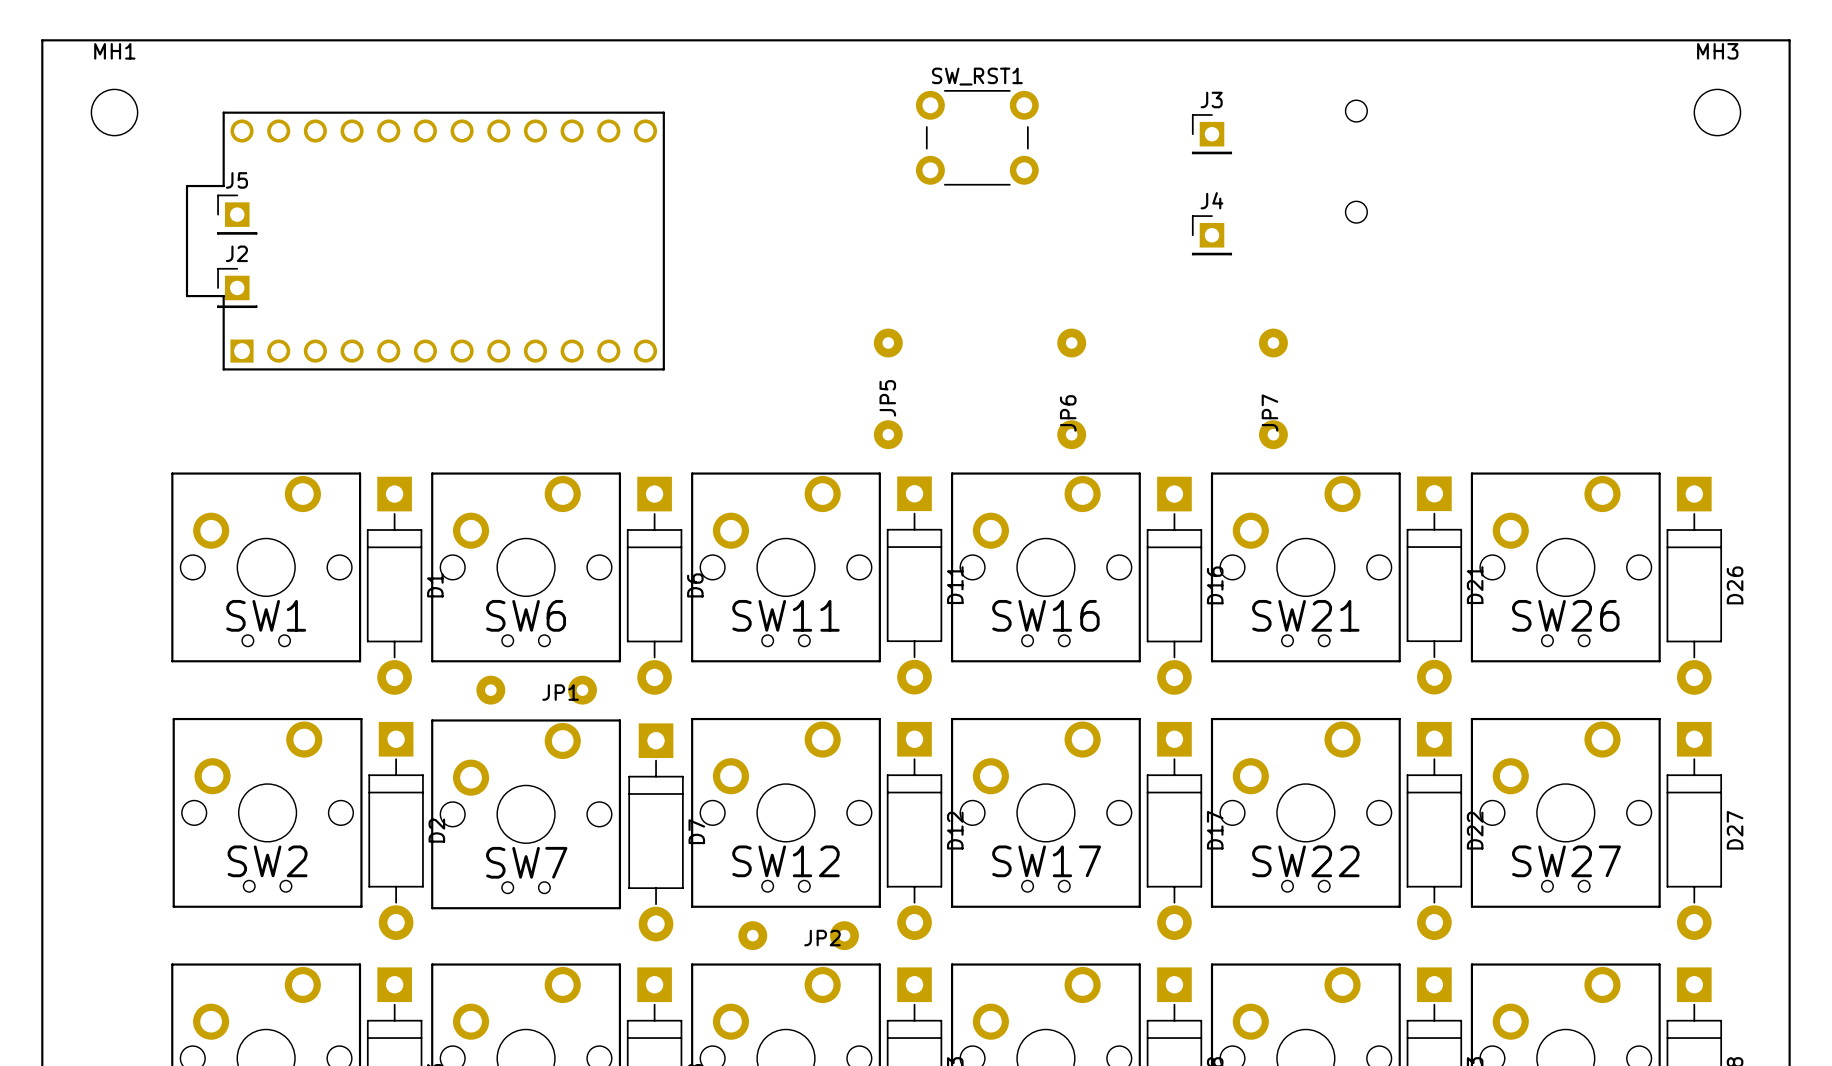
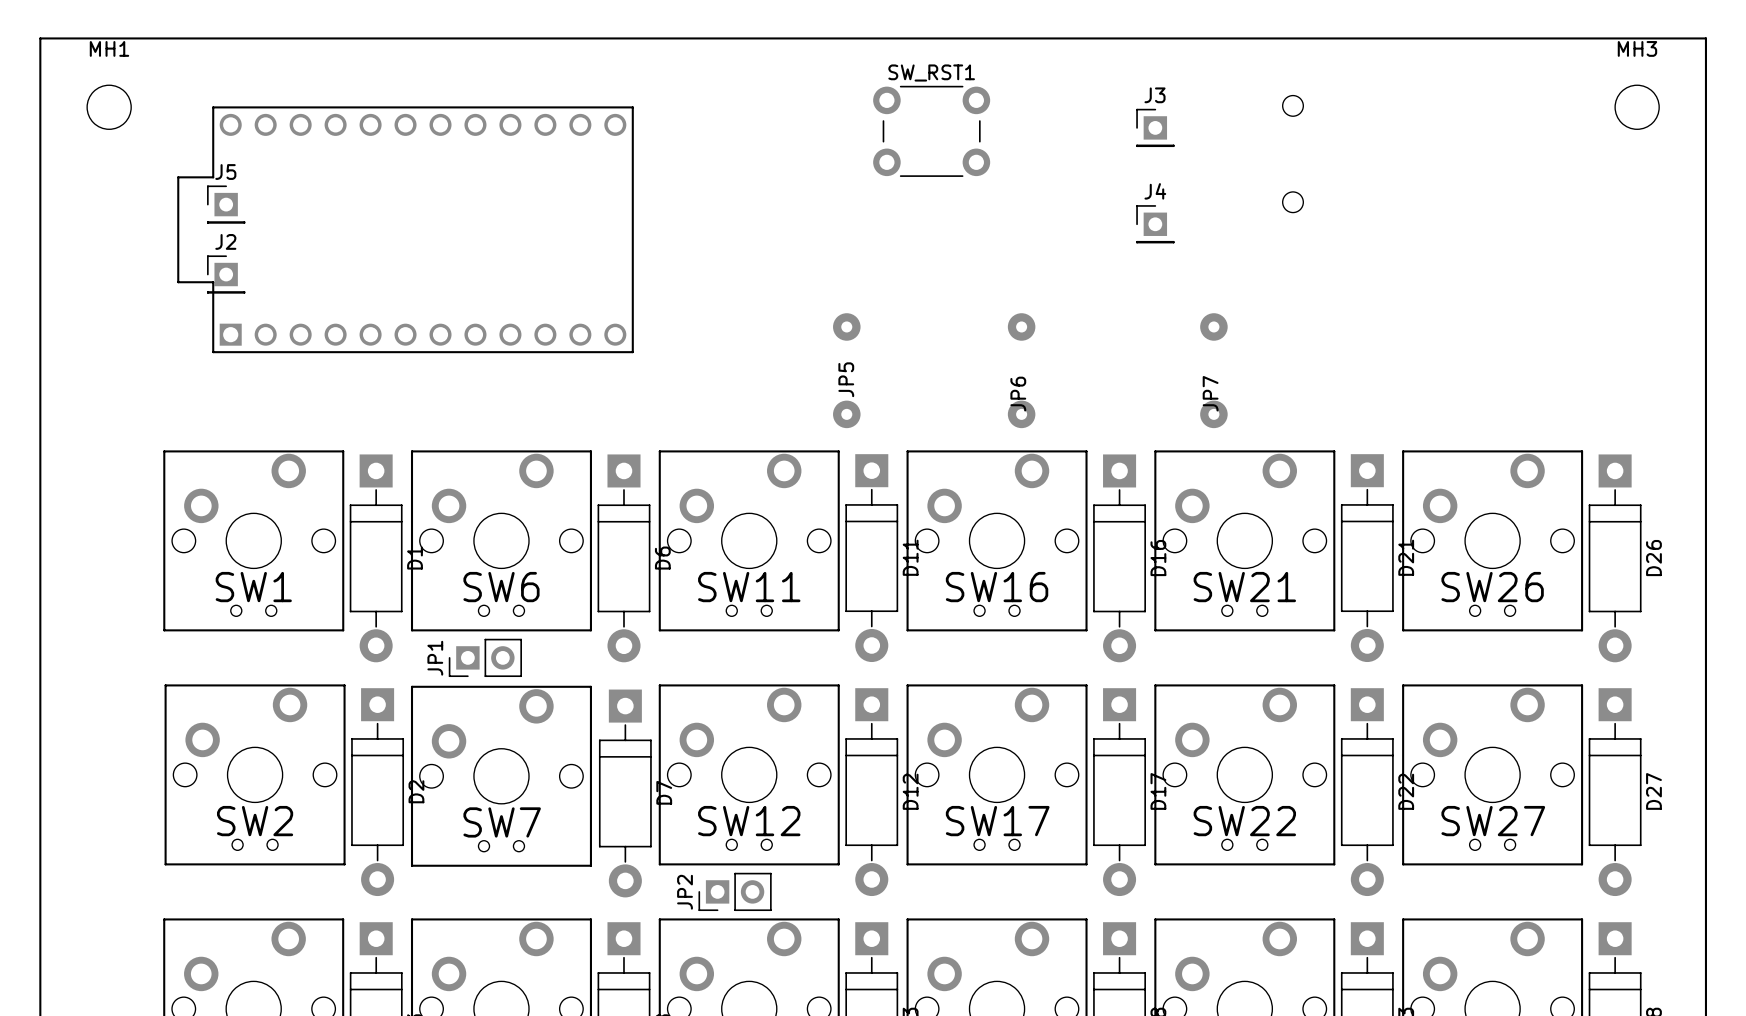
JP1 footprint: [476, 675, 597, 705] -> [448, 638, 522, 678]
JP1 name position: JP1 (560, 692) -> JP1 (435, 658)
JP2 footprint: [738, 921, 859, 951] -> [698, 872, 772, 912]
JP2 name position: JP2 (822, 938) -> JP2 (685, 892)

